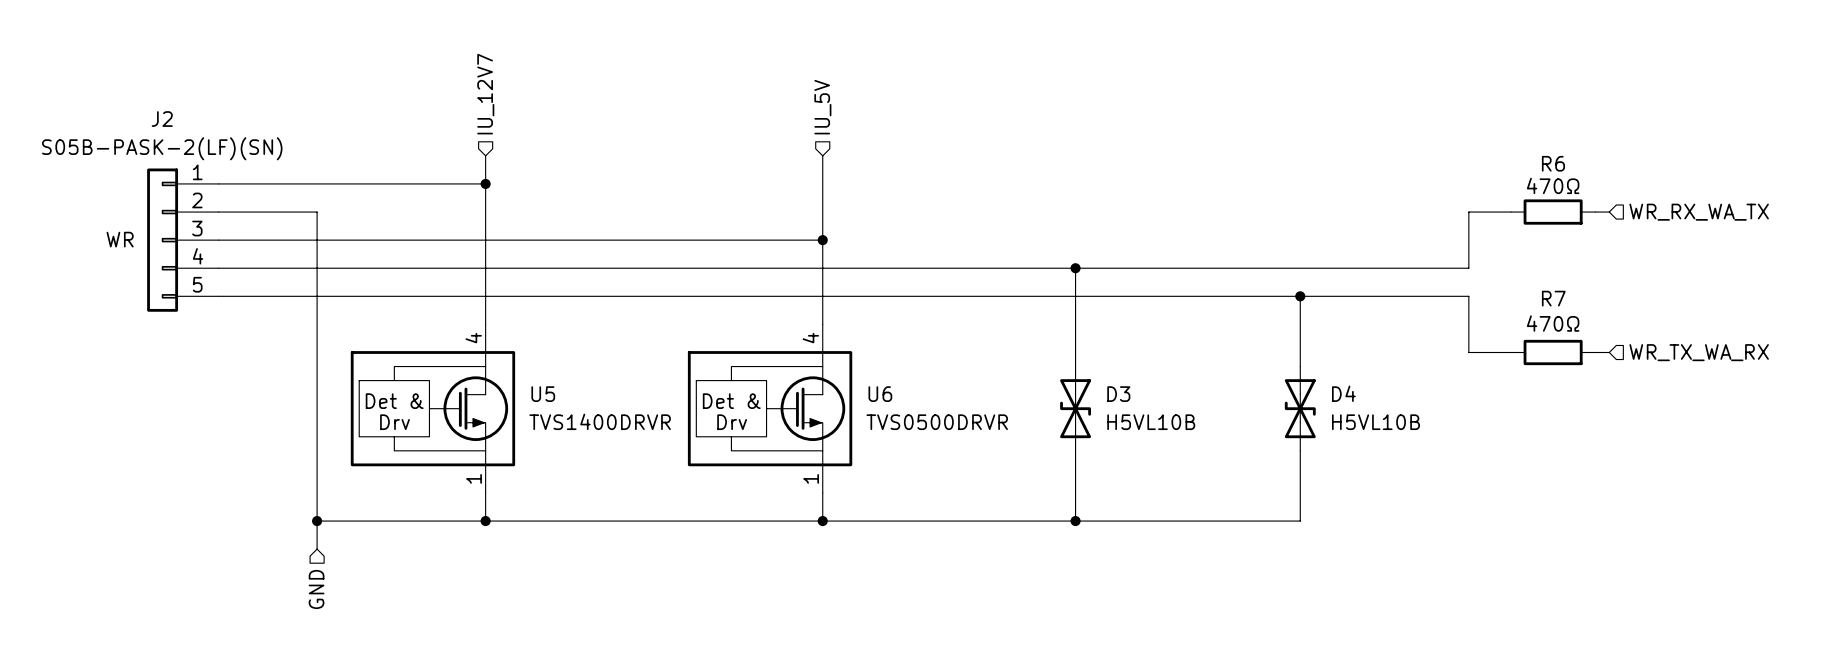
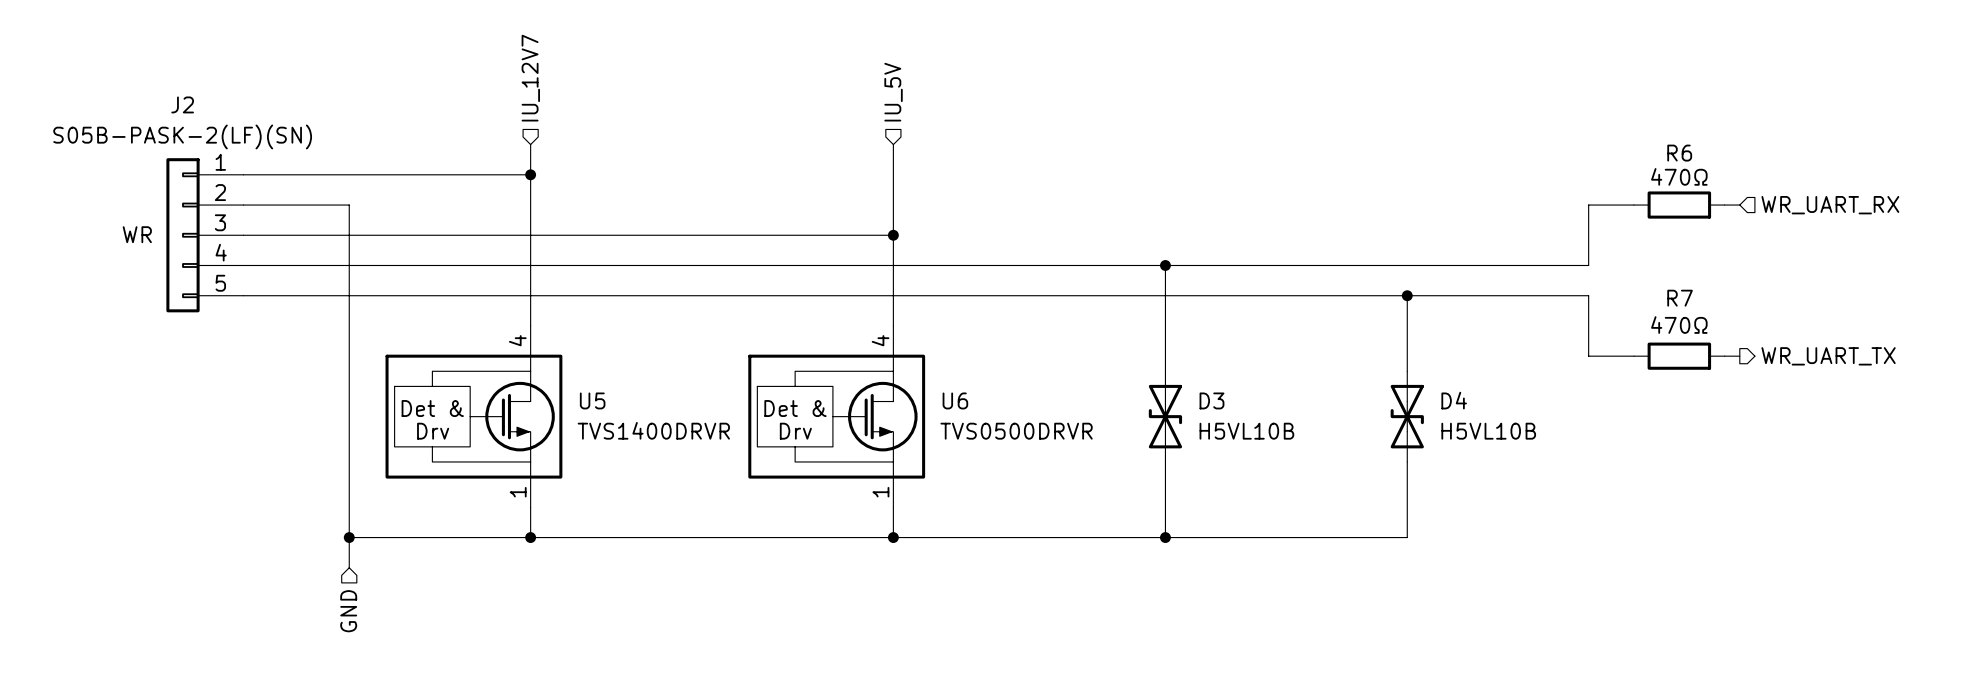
hierarchical label: WR_RX_WA_TX (1699, 212) -> WR_UART_RX (1830, 205)
hierarchical label shape: input (1699, 352) -> output (1828, 356)
hierarchical label: WR_TX_WA_RX (1699, 352) -> WR_UART_TX (1828, 356)

